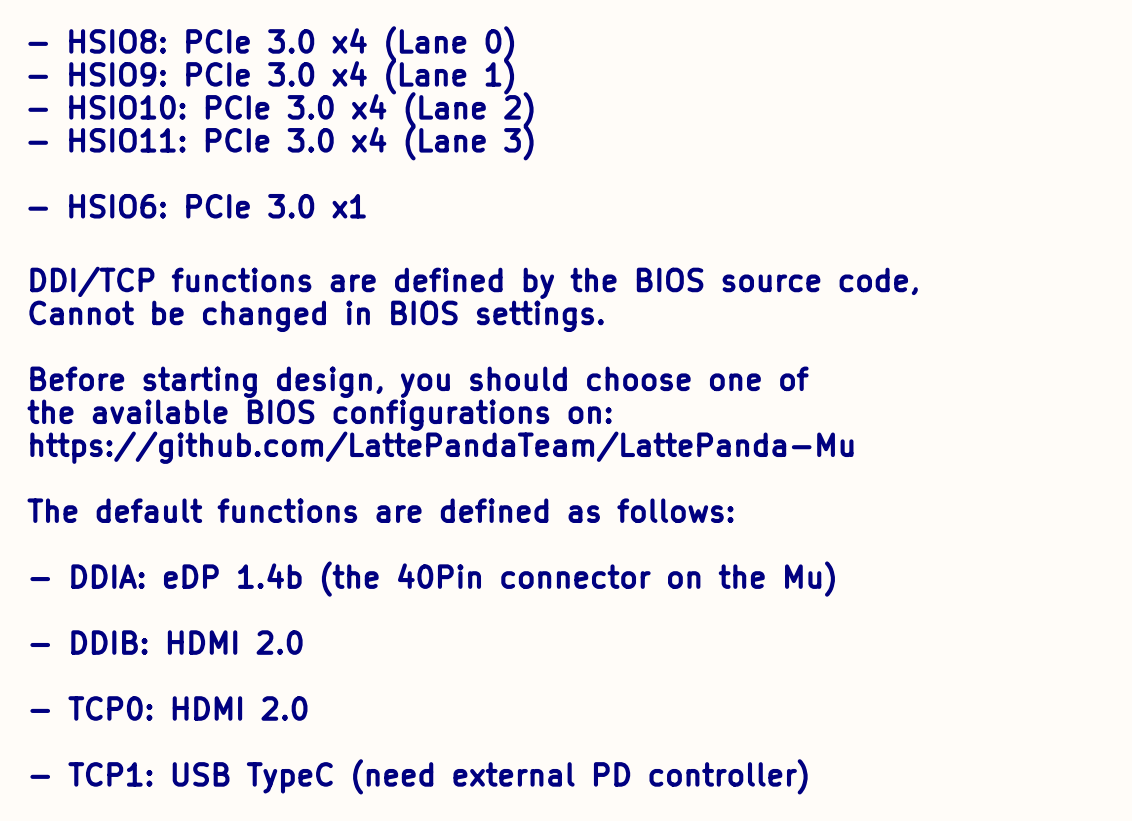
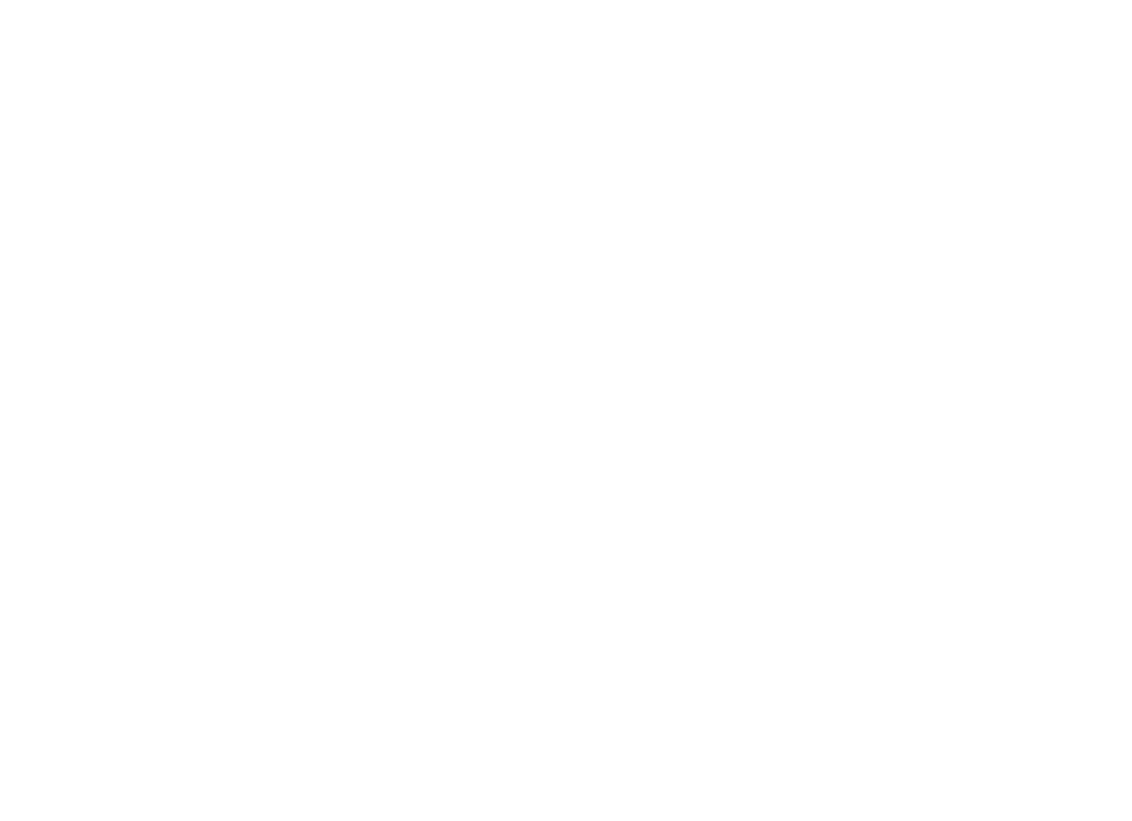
text: - HSIO8: PCIe 3.0 x4 (Lane 0) (271, 43) -> none
text: - HSIO9: PCIe 3.0 x4 (Lane 1) (271, 76) -> none
text: - HSIO10: PCIe 3.0 x4 (Lane 2) (280, 109) -> none
text: - HSIO11: PCIe 3.0 x4 (Lane 3) (280, 142) -> none
text: - HSIO6: PCIe 3.0 x1 (197, 206) -> none
text: DDI/TCP functions are defined by the BIOS source code, (474, 282) -> none
text: Cannot be changed in BIOS settings. (316, 316) -> none
text: Before starting design, you should choose one of (419, 382) -> none
text: the available BIOS configurations on: (319, 415) -> none
text: https://github.com/LattePandaTeam/LattePanda-Mu (441, 447) -> none
text: The default functions are defined as follows: (380, 510) -> none
text: - DDIA: eDP 1.4b (the 40Pin connector on the Mu) (432, 579) -> none
text: - DDIB: HDMI 2.0 (166, 642) -> none
text: - TCP0: HDMI 2.0 (168, 708) -> none
text: - TCP1: USB TypeC (need external PD controller) (419, 776) -> none

